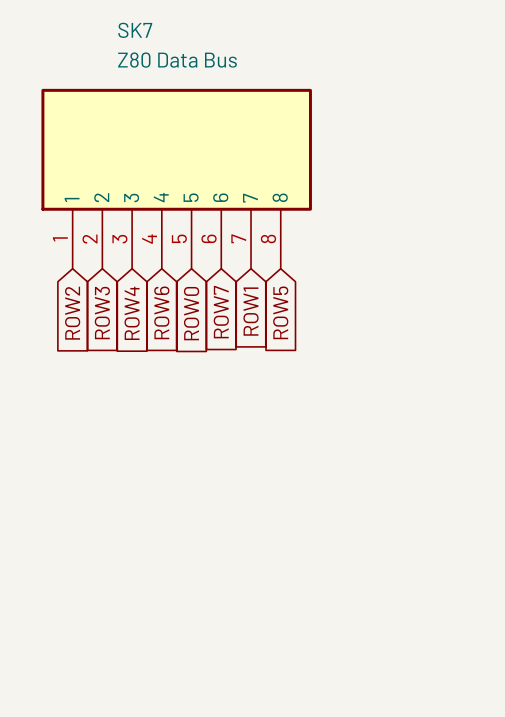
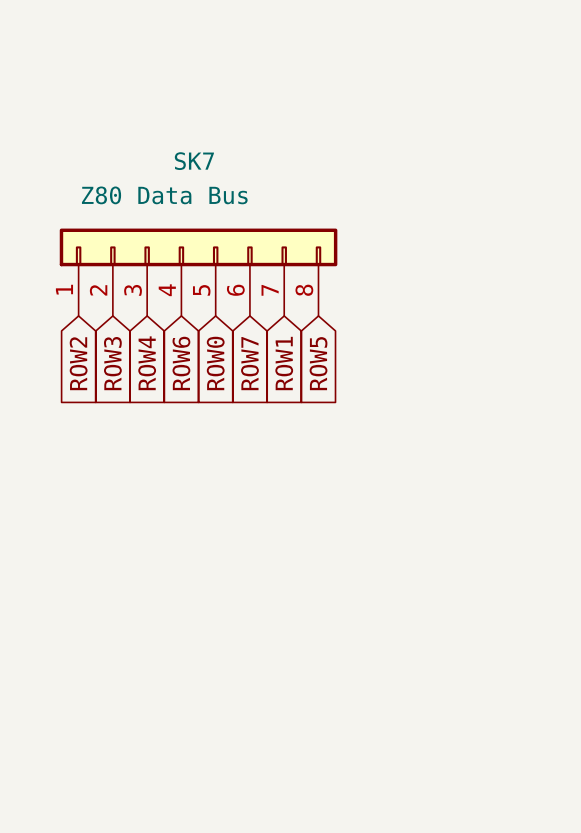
SK7 name position: SK7 (135, 30) -> SK7 (194, 161)
SK7 value position: Z80 Data Bus (177, 60) -> Z80 Data Bus (164, 195)
SK7 symbol: [41, 88, 312, 269] -> [59, 228, 338, 316]

